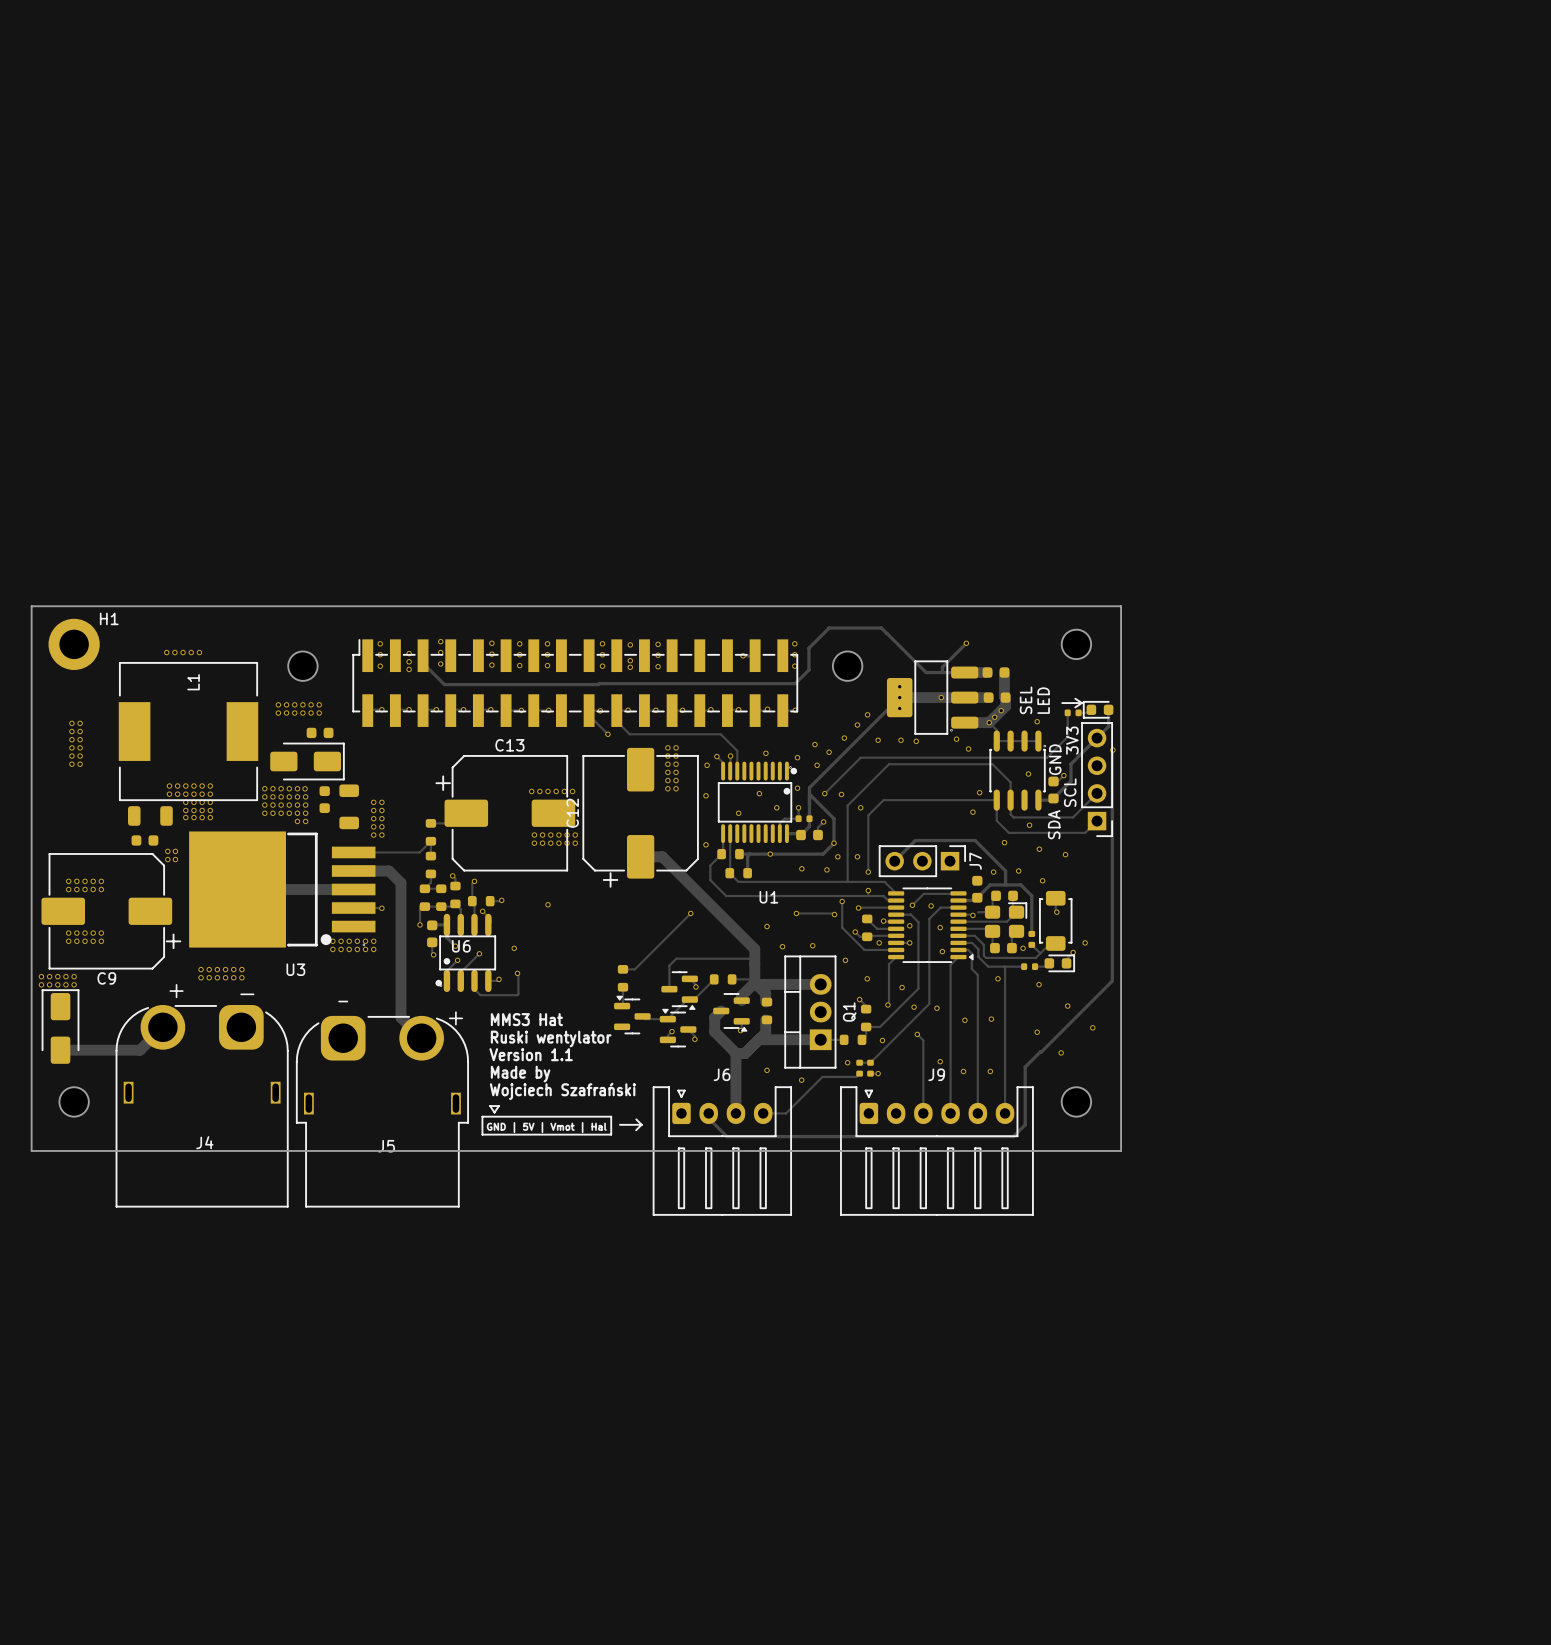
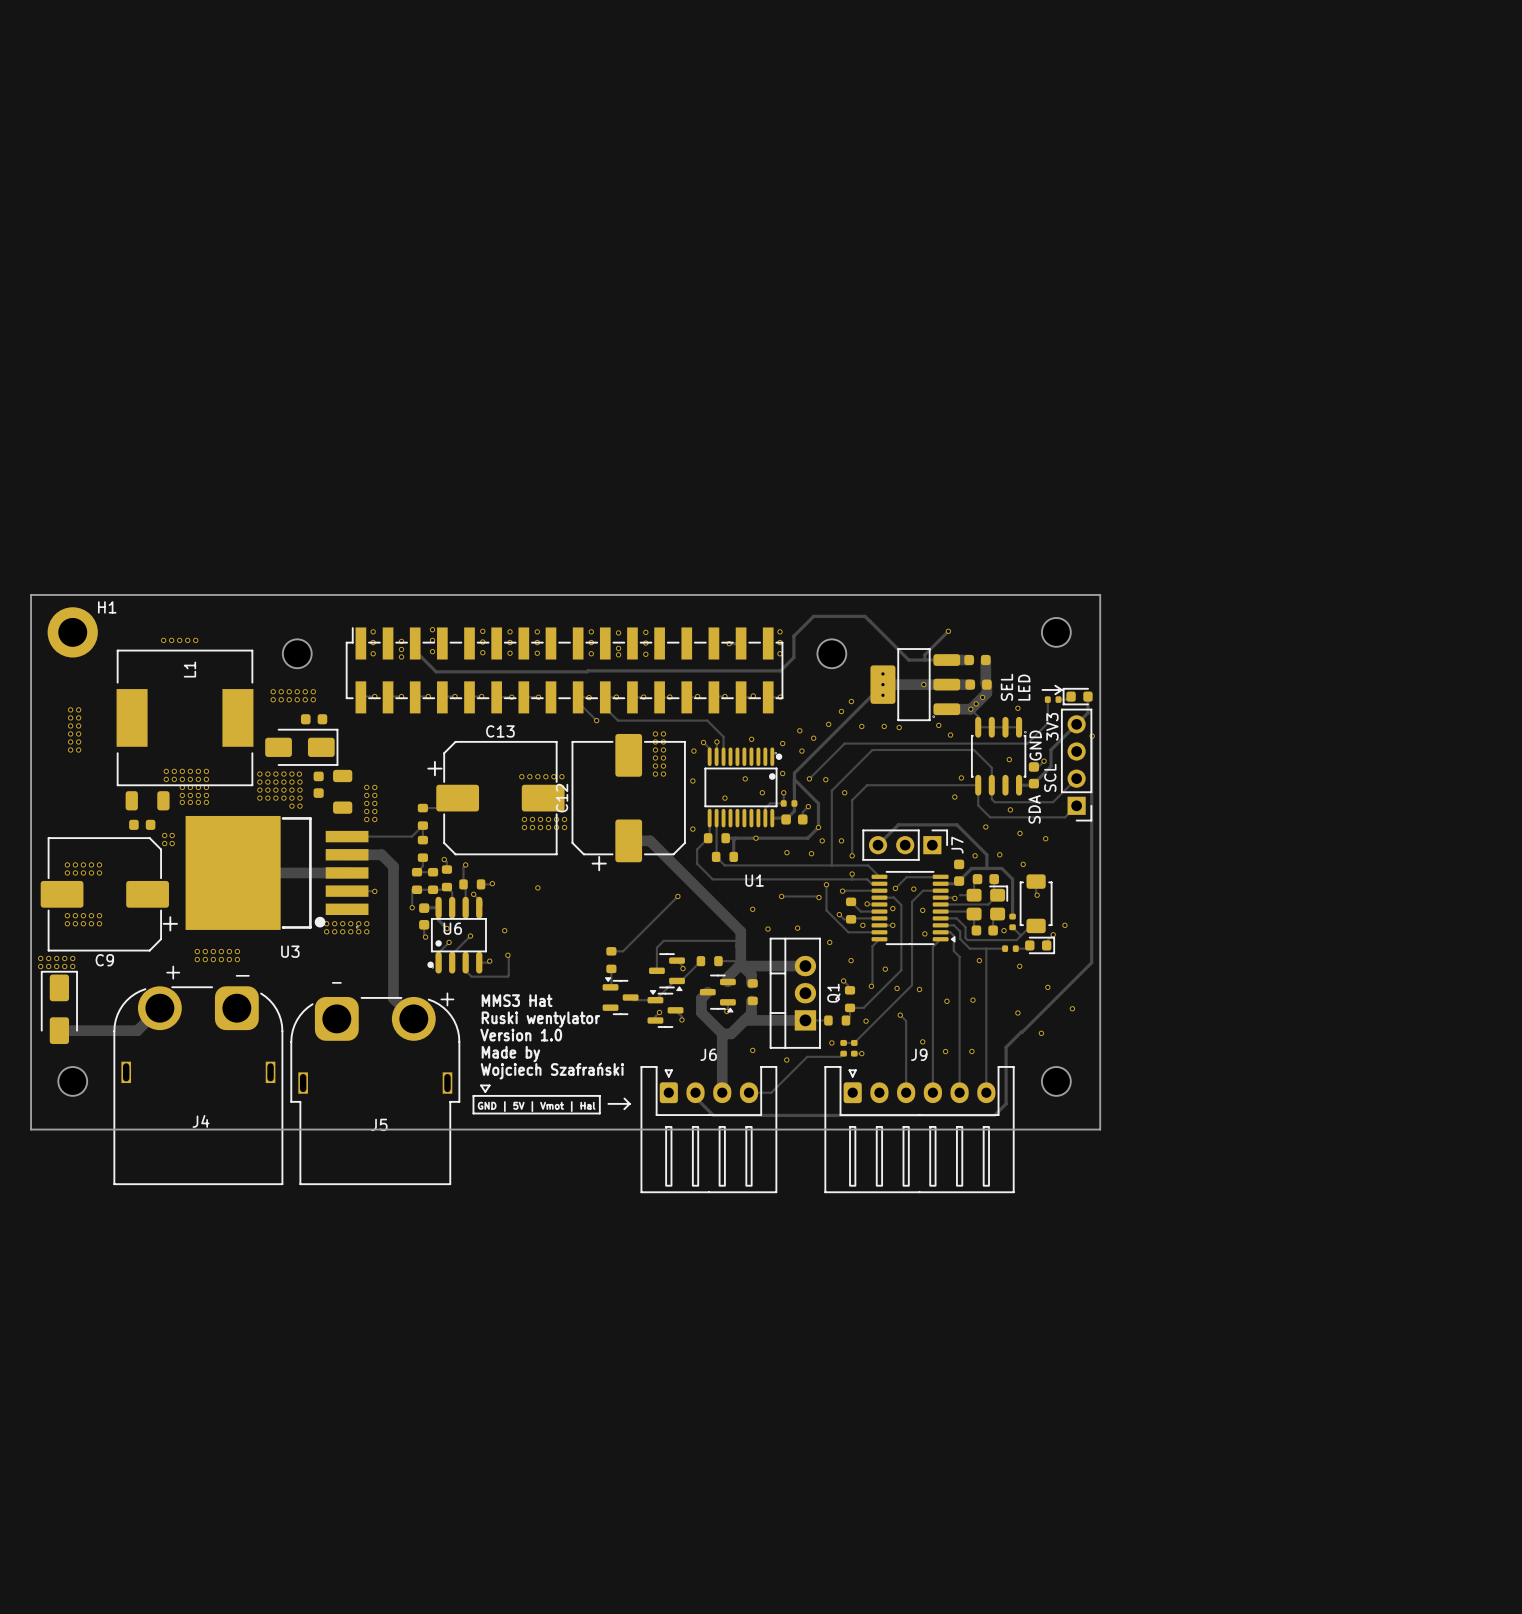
text: Version 1.1 (531, 1054) -> Version 1.0 (521, 1035)

